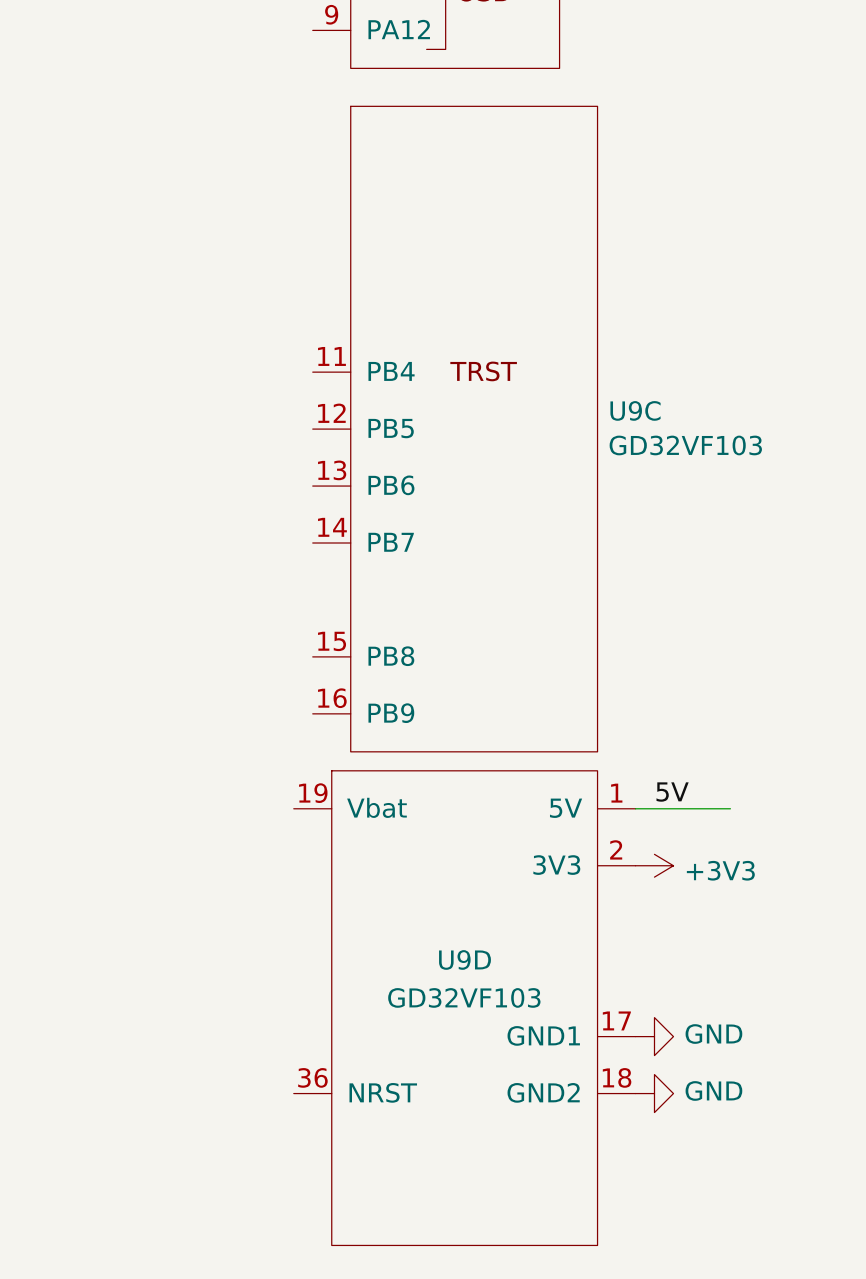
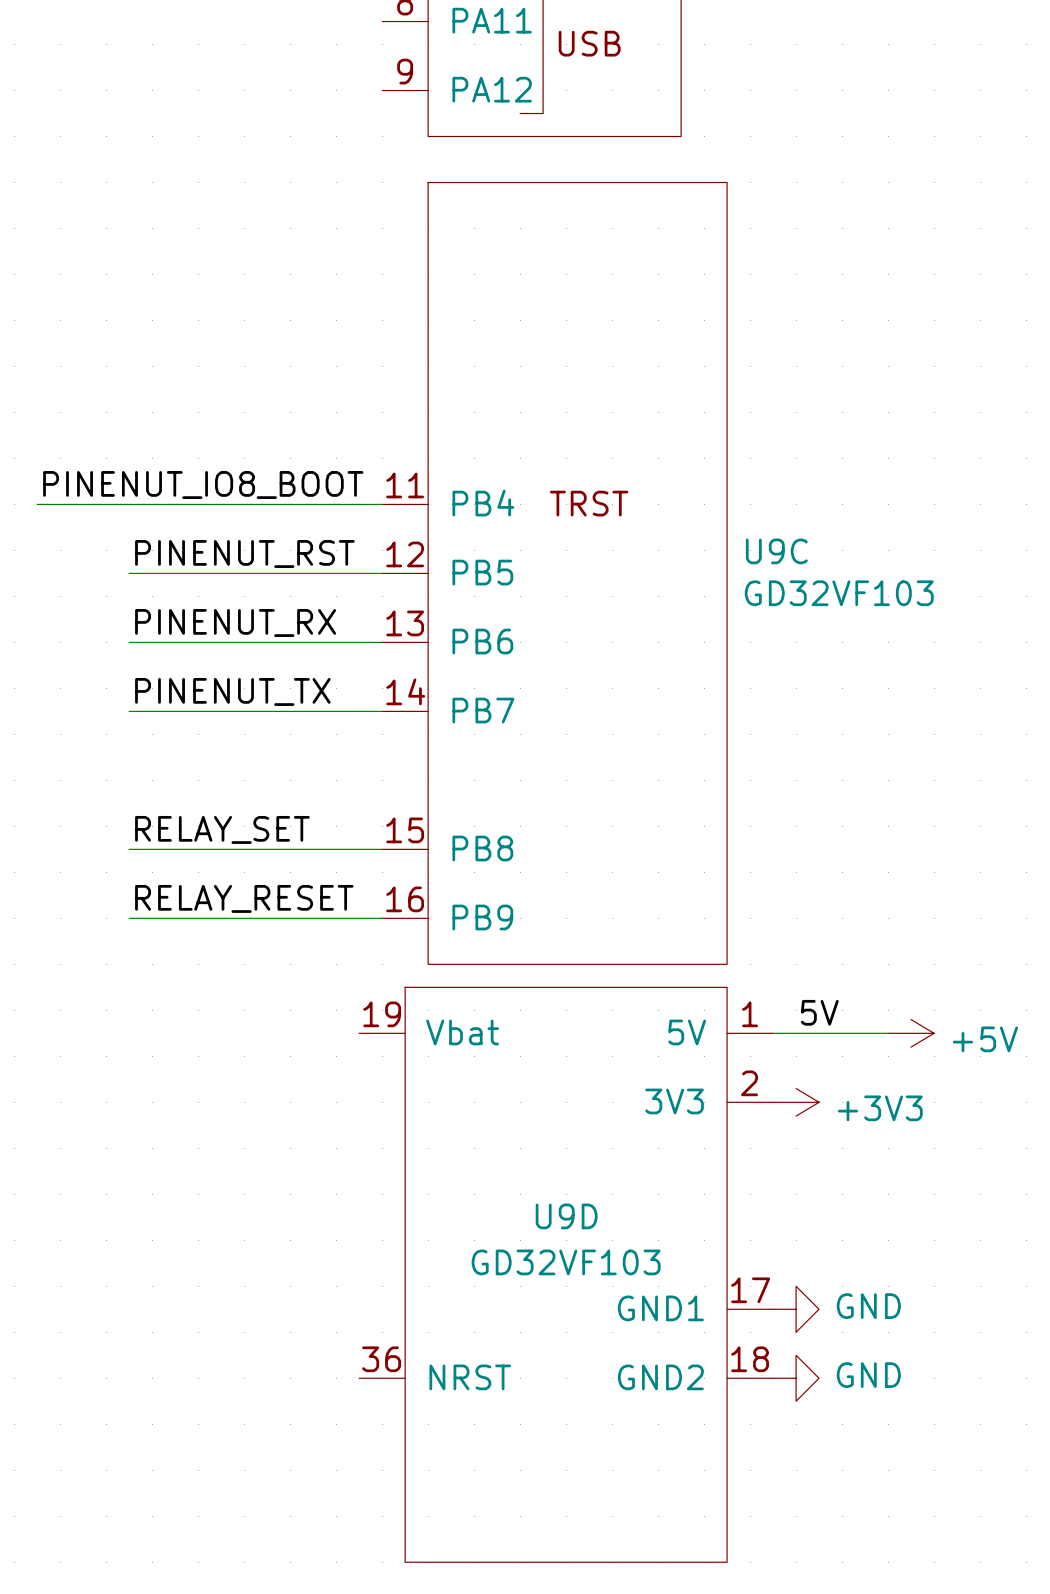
label: none -> PINENUT_IO8_BOOT (203, 485)
wire: none -> (37, 504) (382, 504)
label: none -> PINENUT_RST (244, 553)
wire: none -> (129, 573) (382, 573)
label: none -> PINENUT_RX (235, 622)
wire: none -> (129, 642) (382, 642)
label: none -> PINENUT_TX (232, 691)
wire: none -> (129, 711) (382, 711)
label: none -> RELAY_SET (222, 829)
wire: none -> (129, 849) (382, 849)
label: none -> RELAY_RESET (244, 898)
wire: none -> (129, 918) (382, 918)
power symbol: none -> +5V (911, 1033)

